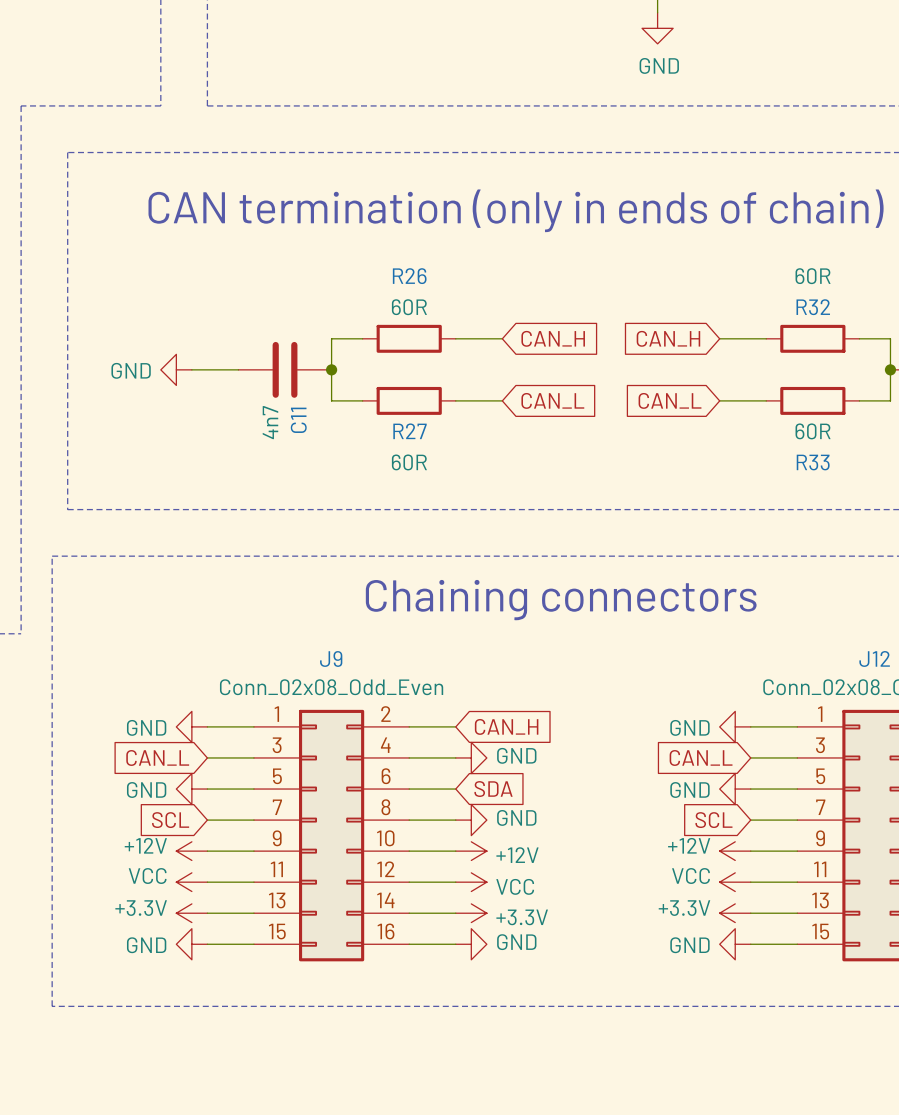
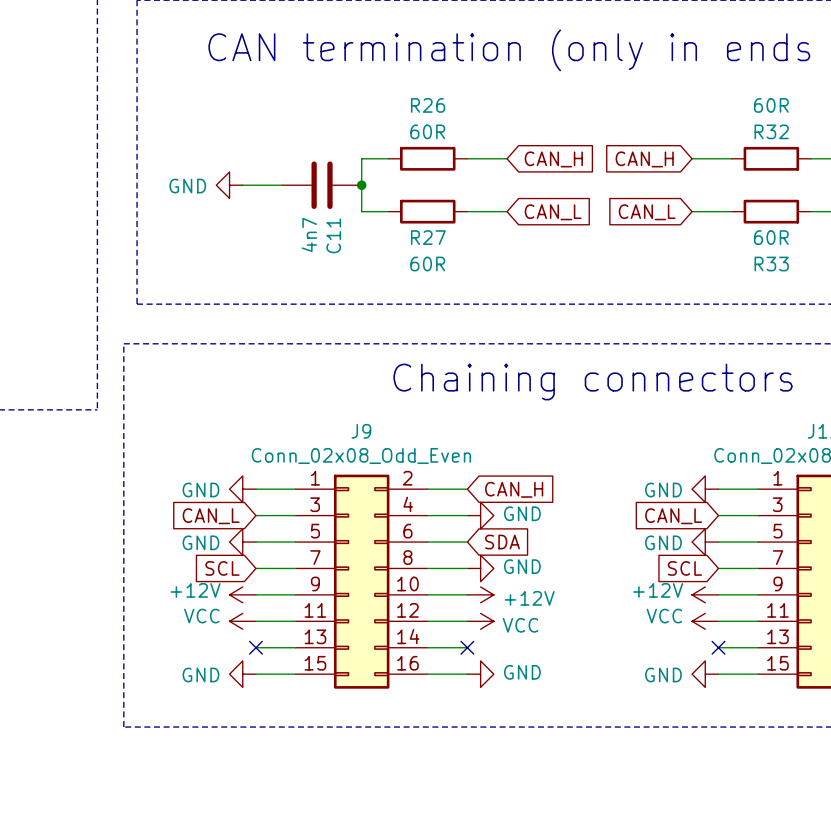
power symbol: +3.3V (191, 913) -> none
no-connect mark: none -> (255, 647)
no-connect mark: none -> (467, 647)
power symbol: +3.3V (471, 913) -> none
power symbol: +3.3V (735, 913) -> none
no-connect mark: none -> (718, 647)

